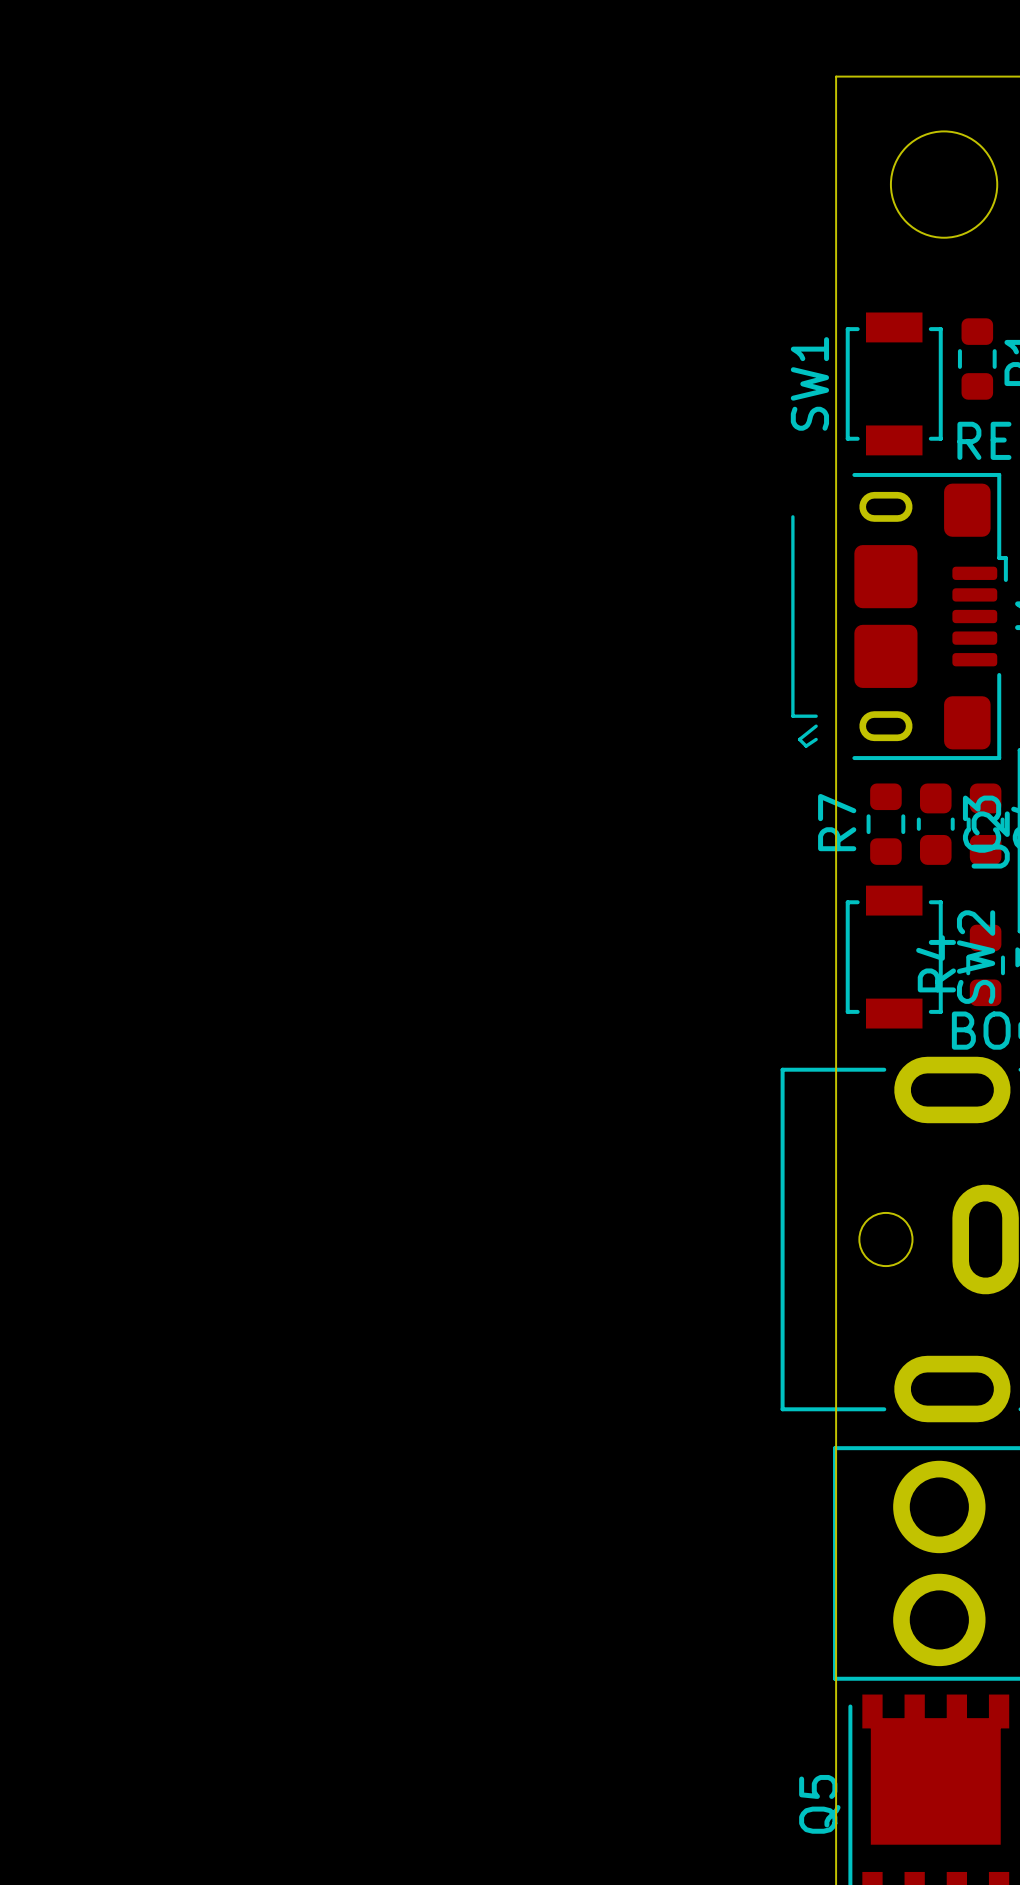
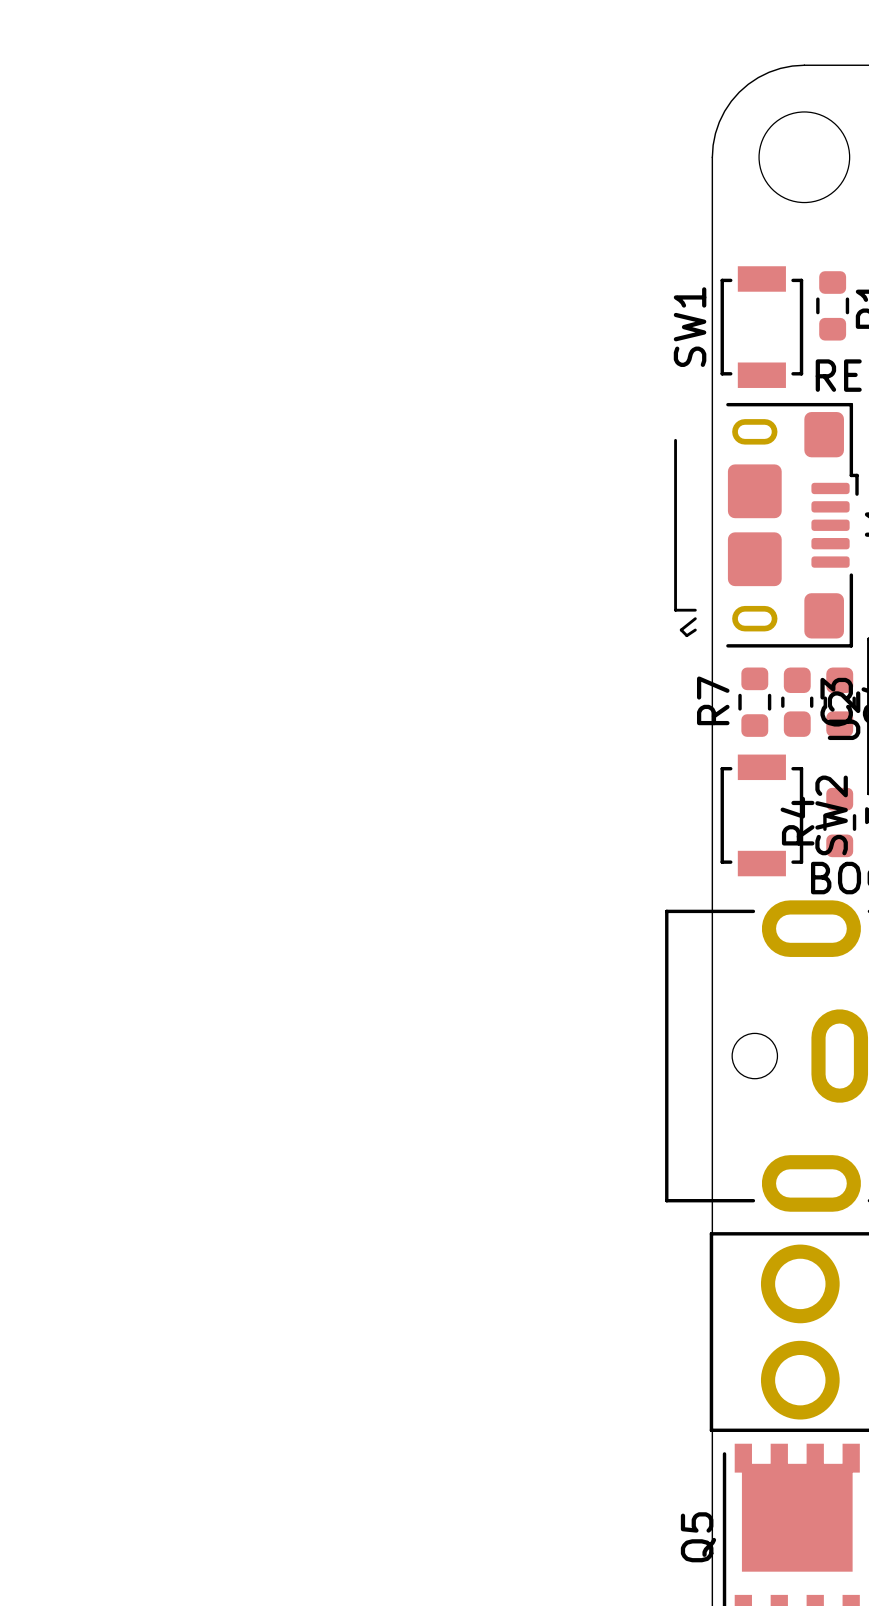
board edge: (944, 76) (836, 76) (836, 184) -> (804, 65) (792, 66) (769, 72) (748, 84) (739, 92) (731, 101) (719, 122) (715, 133) (712, 157)

